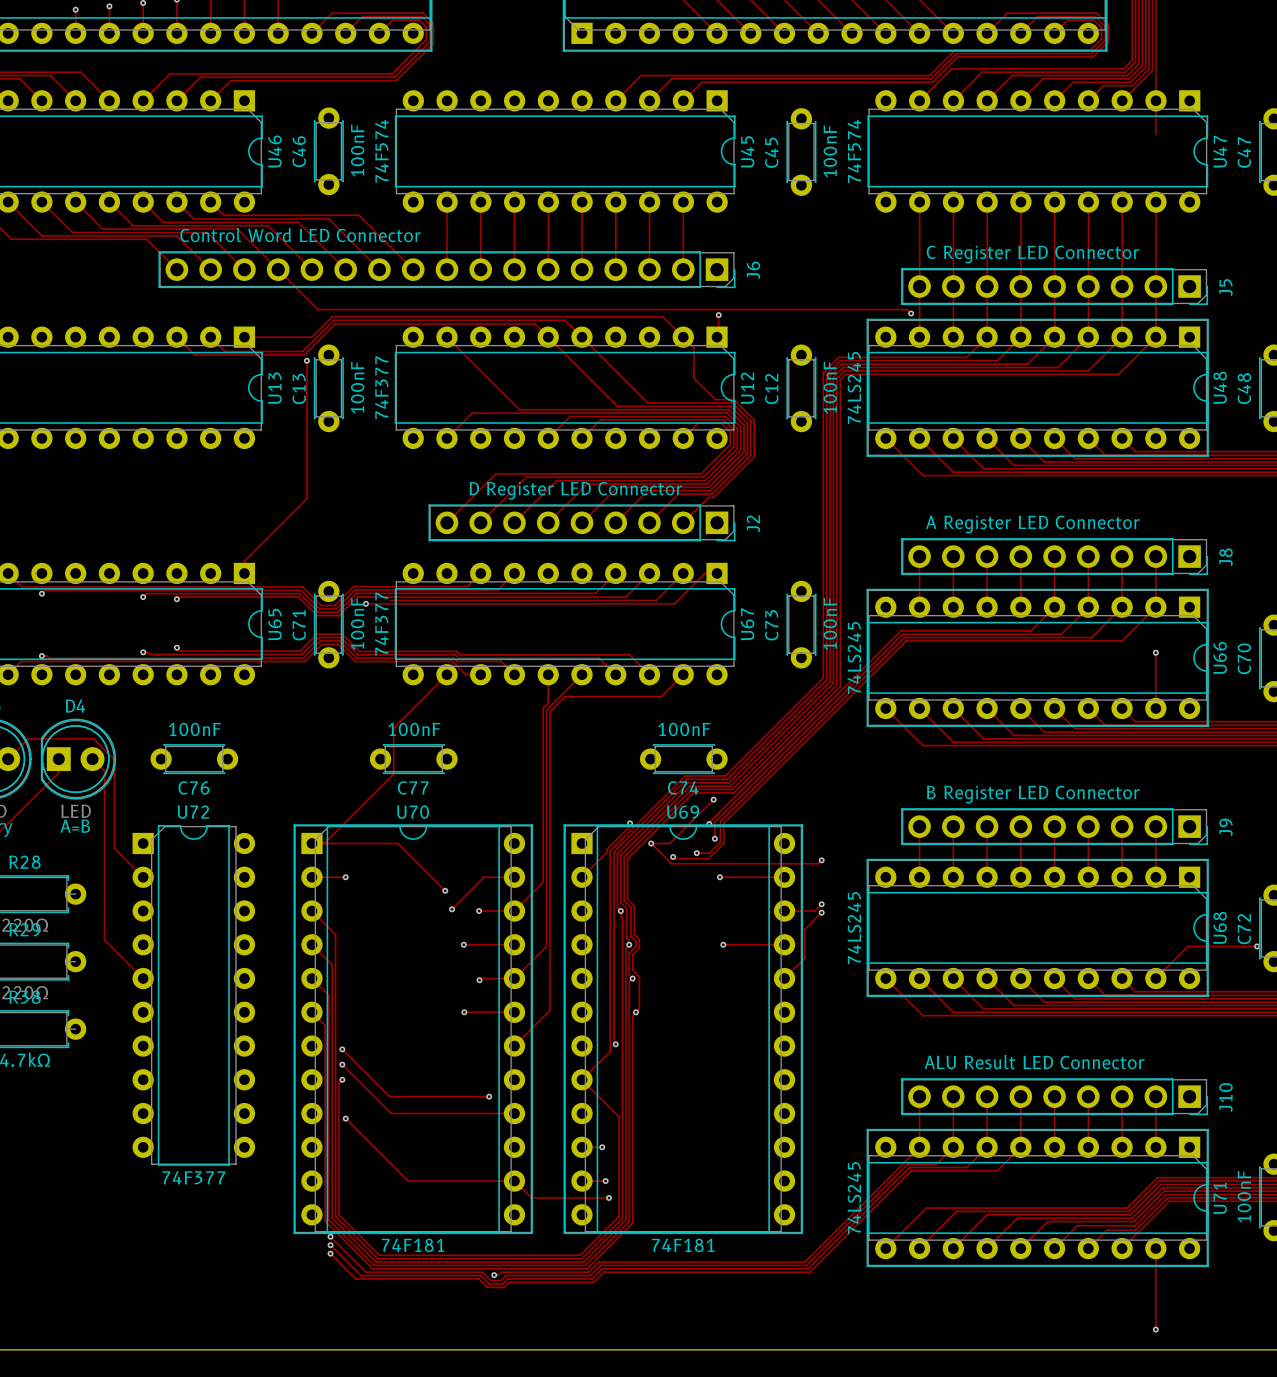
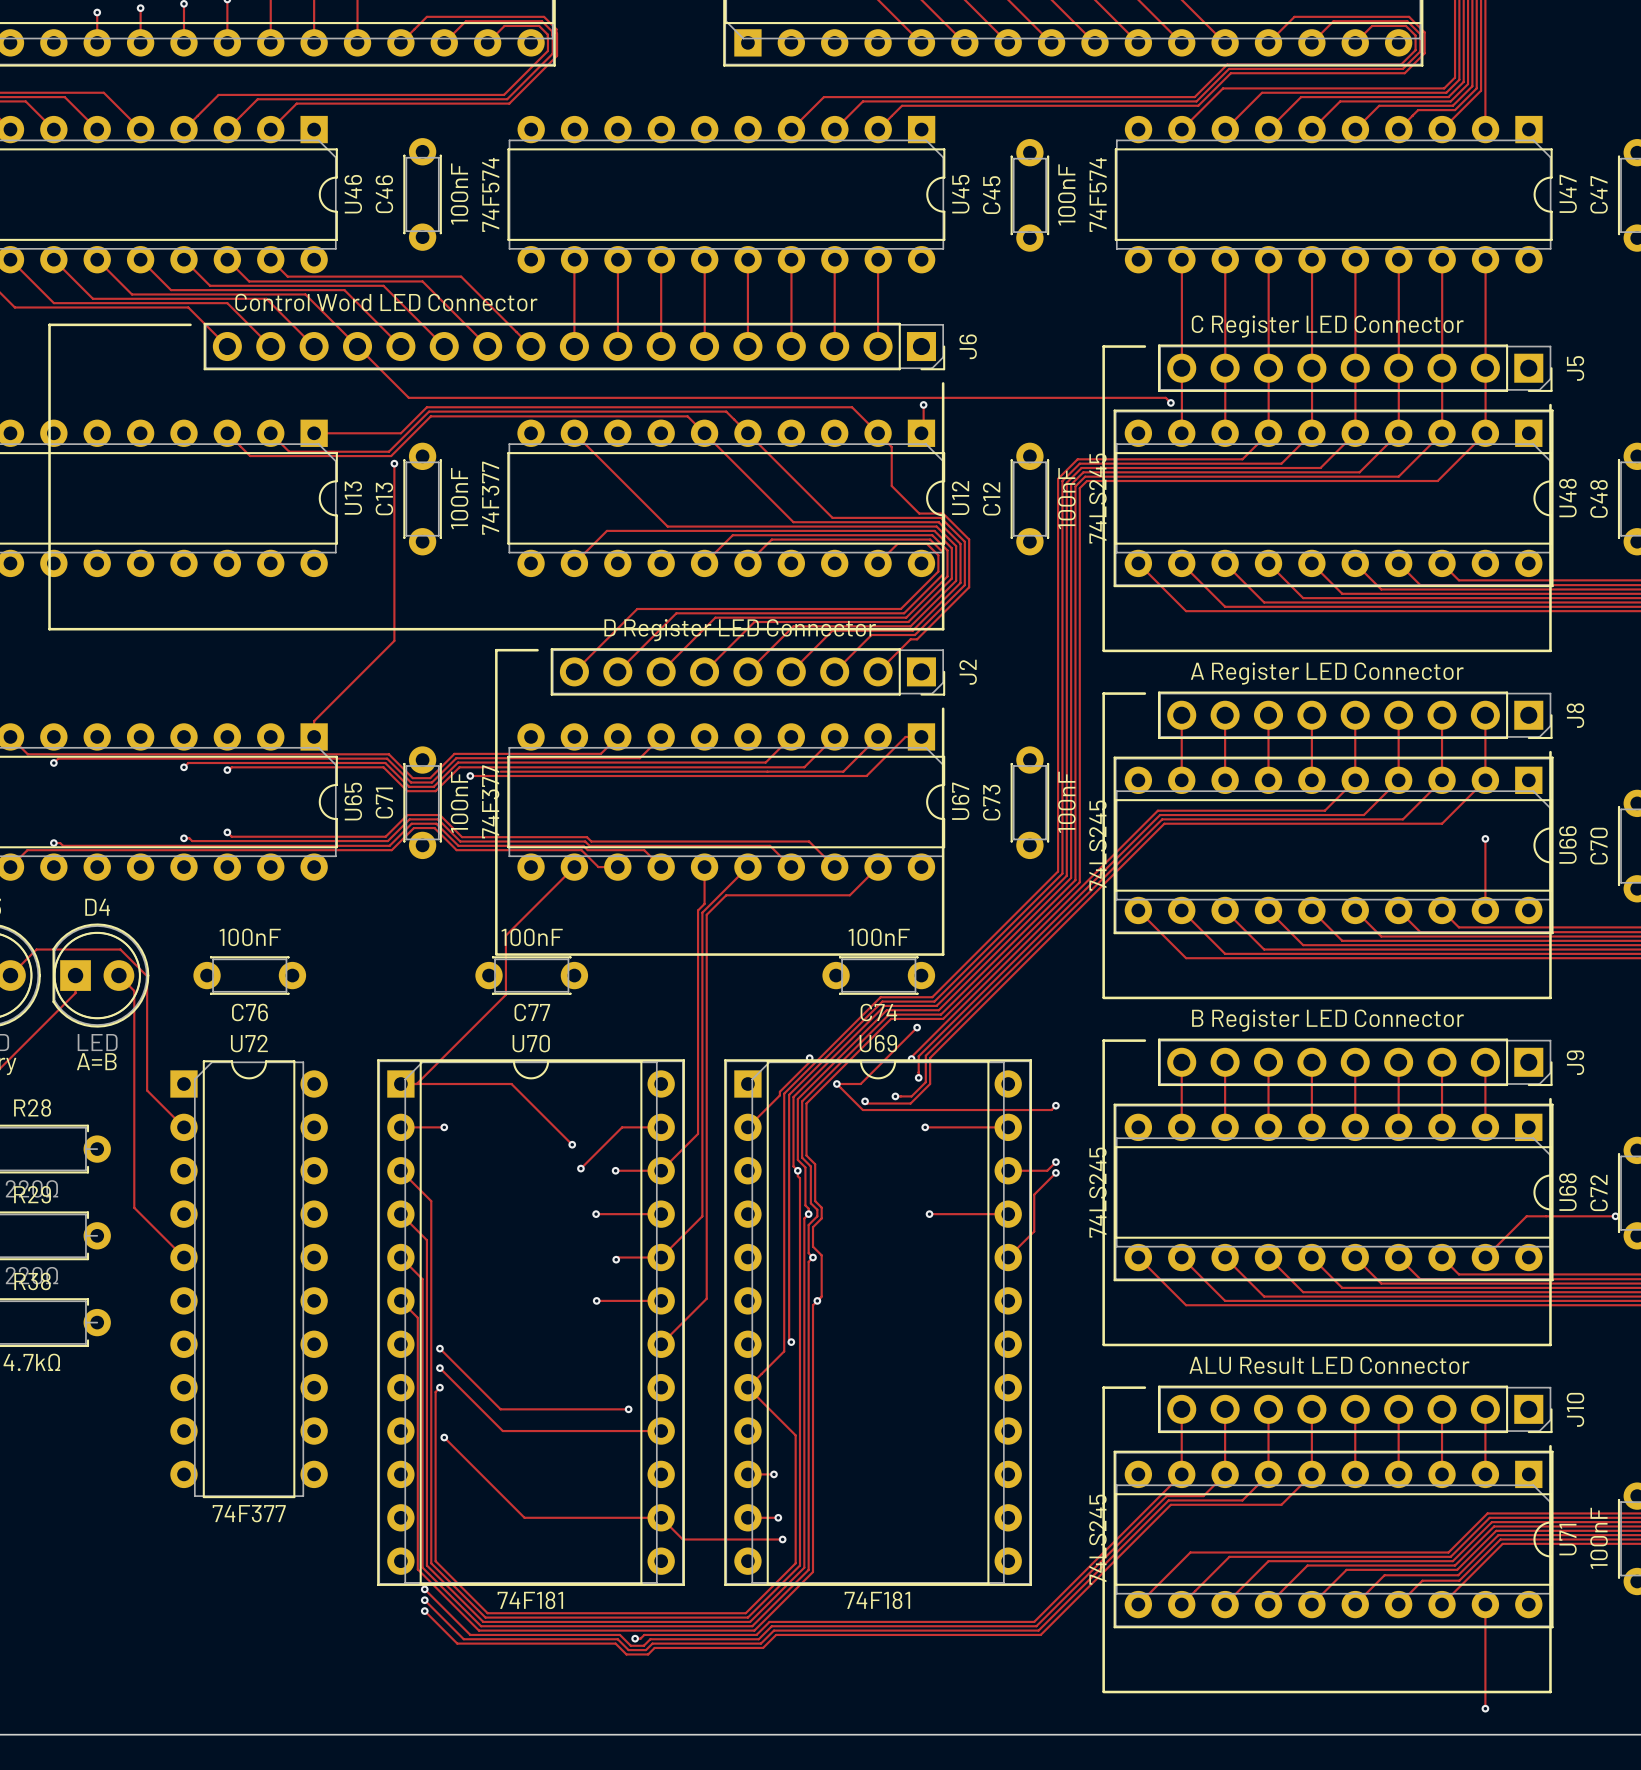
track: (1155, 100) (1155, 134) -> none
line: none -> (190, 324) (49, 324) (49, 629) (943, 629) (943, 383)
line: none -> (1144, 346) (1103, 346) (1103, 650)
line: none -> (1550, 405) (1550, 650) (1103, 650)
line: none -> (537, 650) (496, 650) (496, 953)
line: none -> (1144, 693) (1103, 693) (1103, 997)
line: none -> (943, 708) (943, 954) (496, 954)
line: none -> (1550, 752) (1550, 997) (1103, 997)
line: none -> (1144, 1040) (1103, 1040) (1103, 1344)
line: none -> (1550, 1099) (1550, 1344) (1103, 1344)
line: none -> (1144, 1387) (1103, 1387) (1103, 1691)
line: none -> (1550, 1446) (1550, 1692) (1103, 1692)

